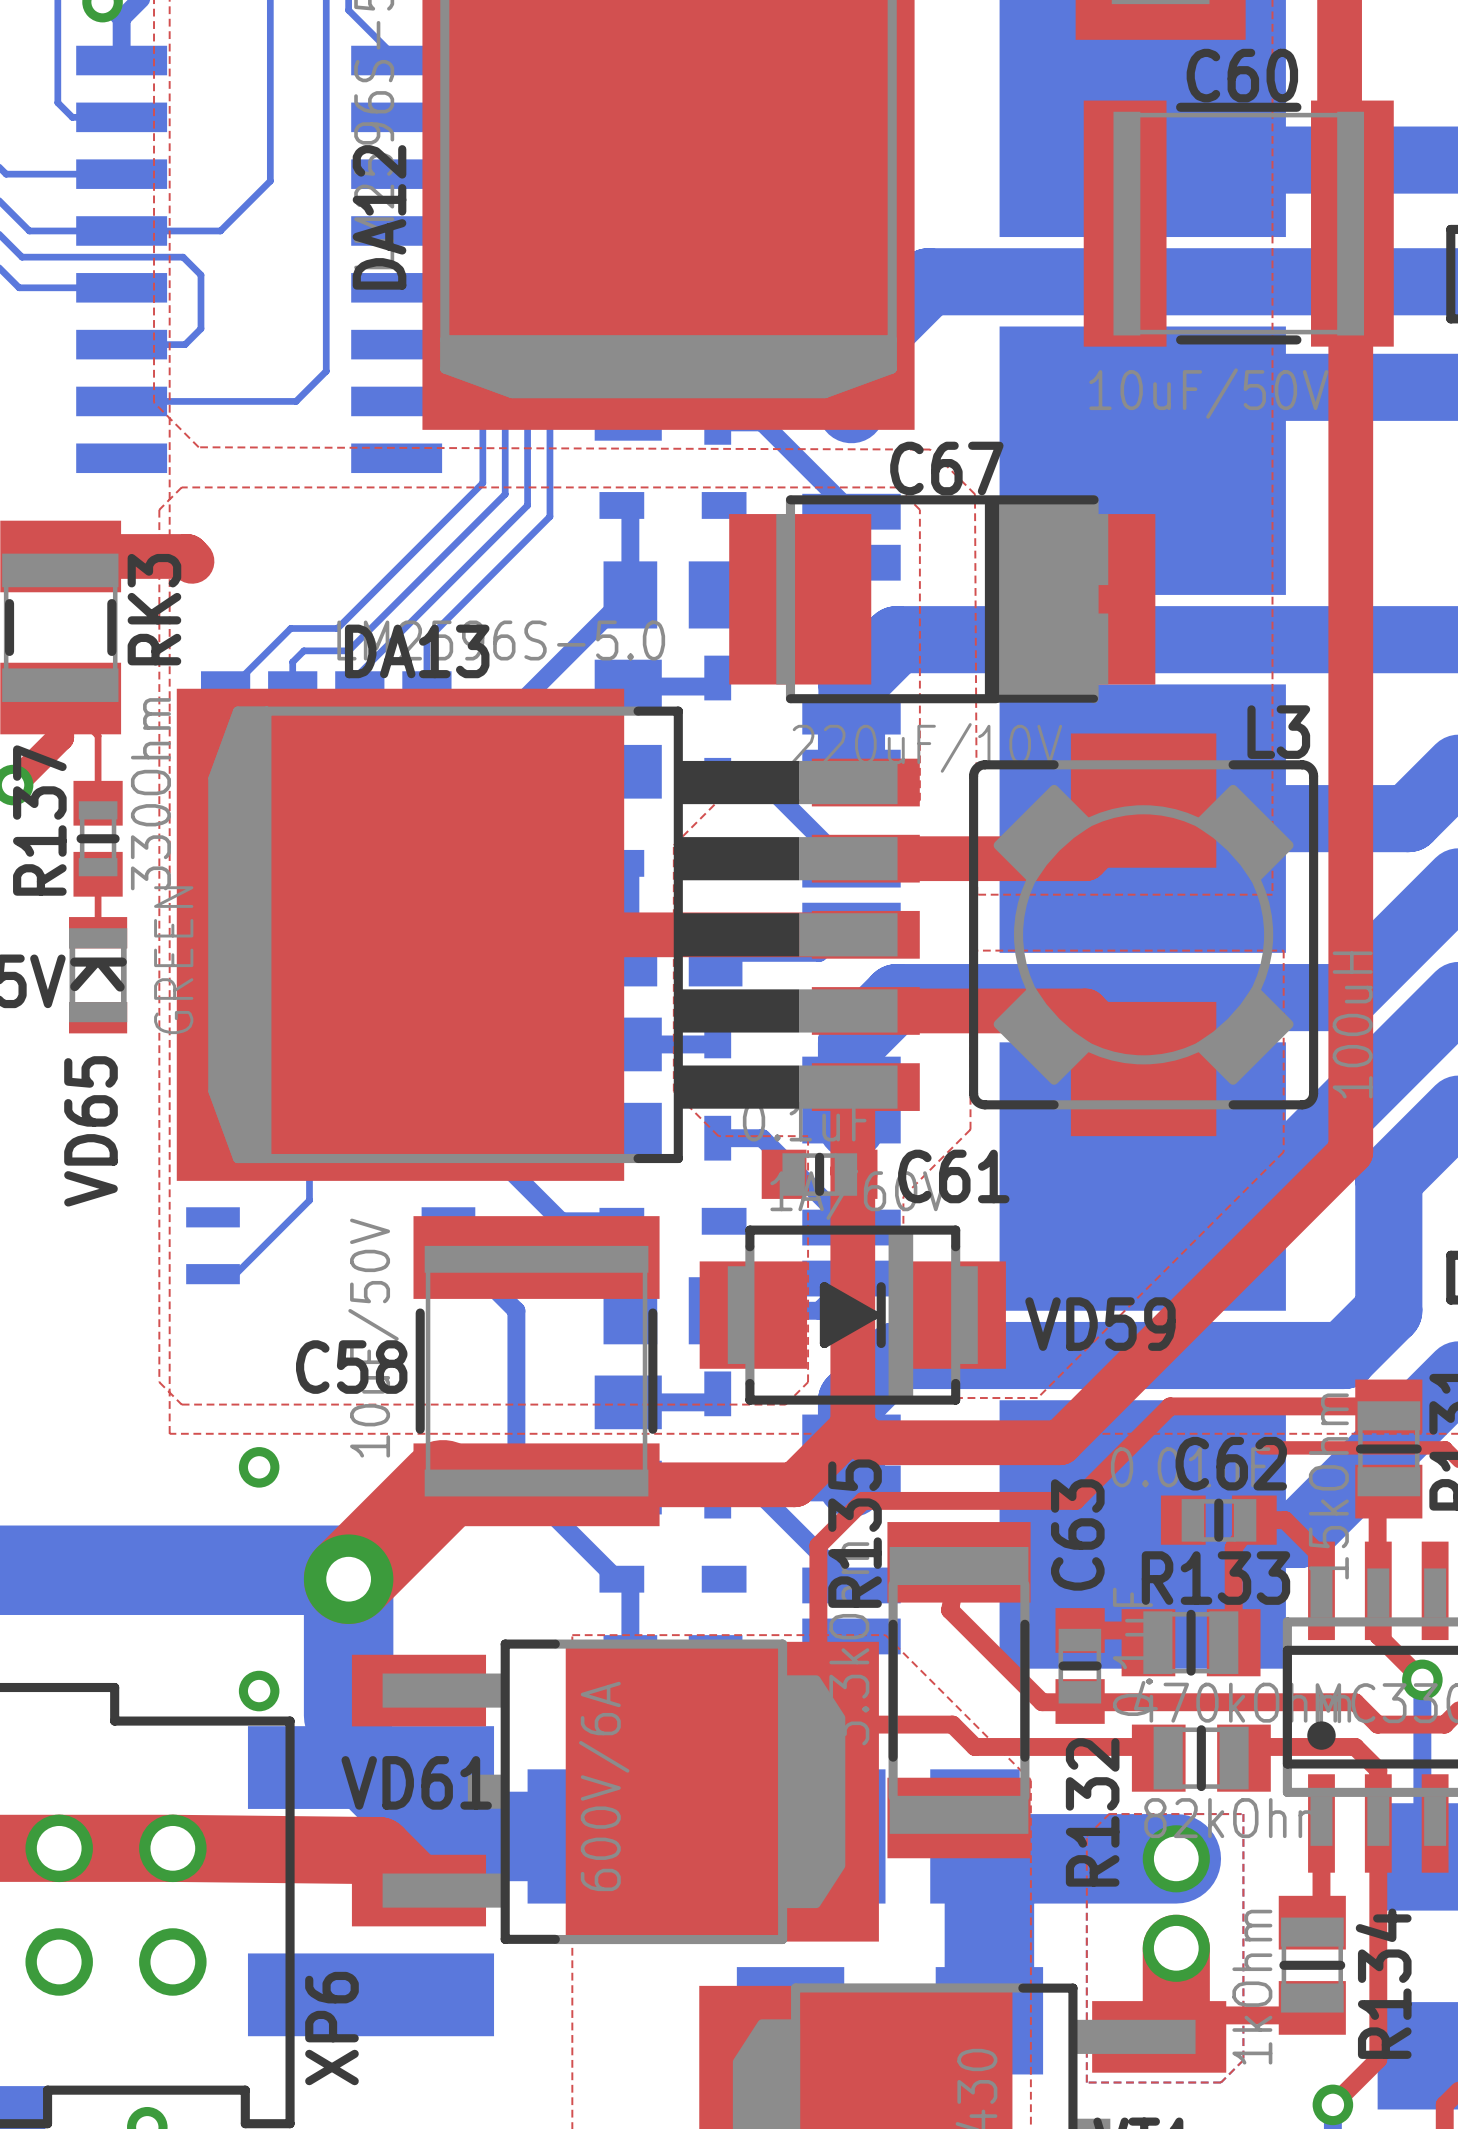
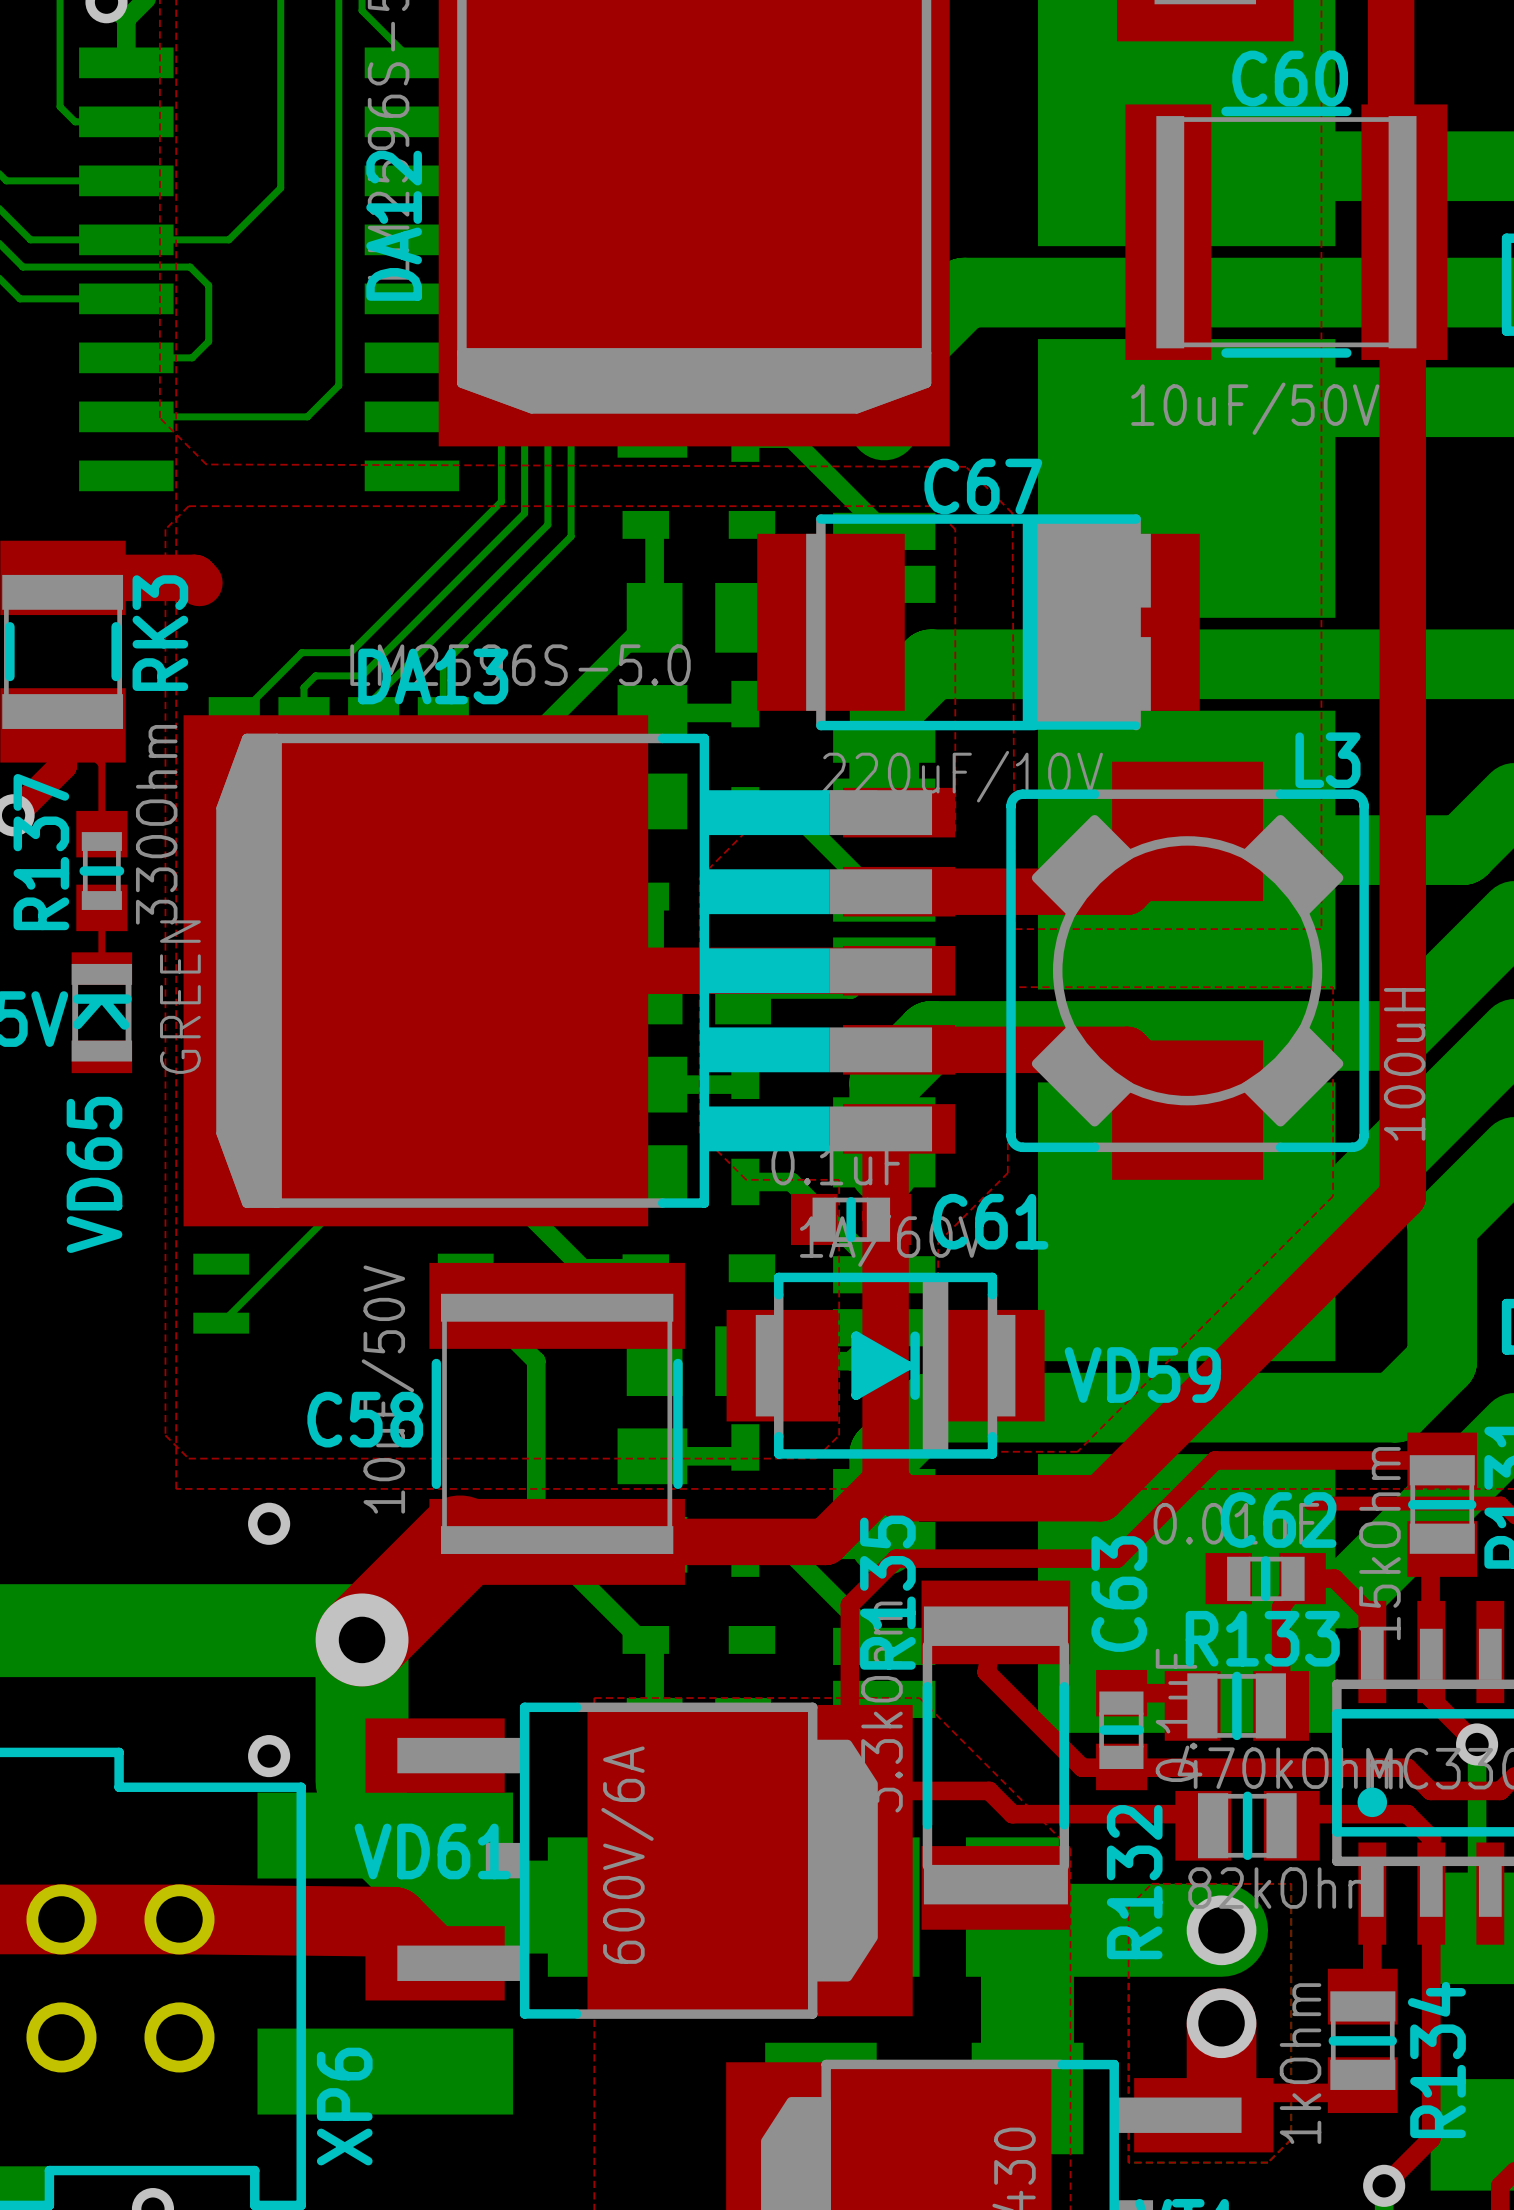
bottom track: (309, 1178) (309, 1200) (235, 1274) (213, 1274) -> (321, 1223) (221, 1322)

